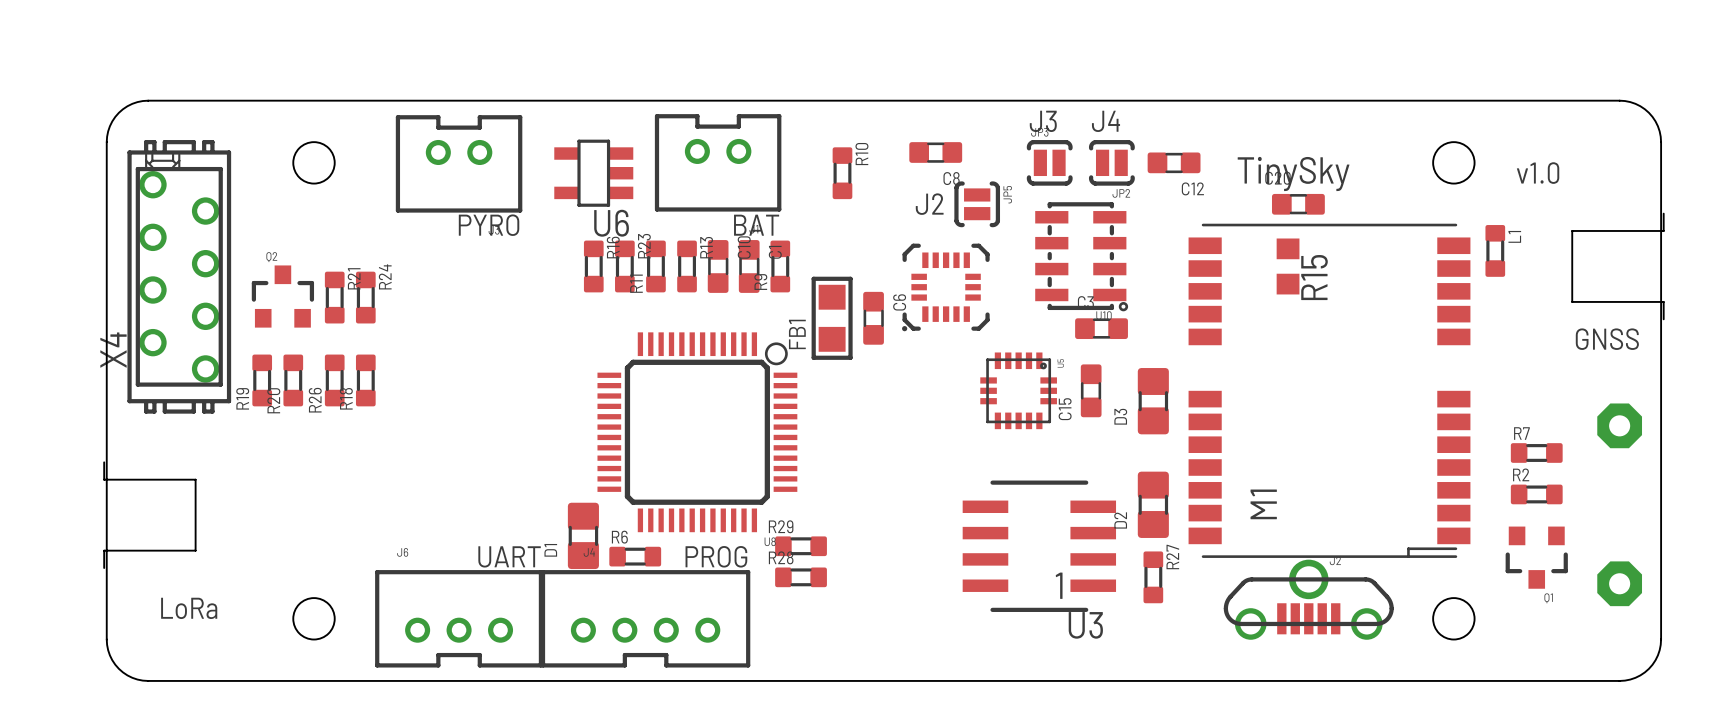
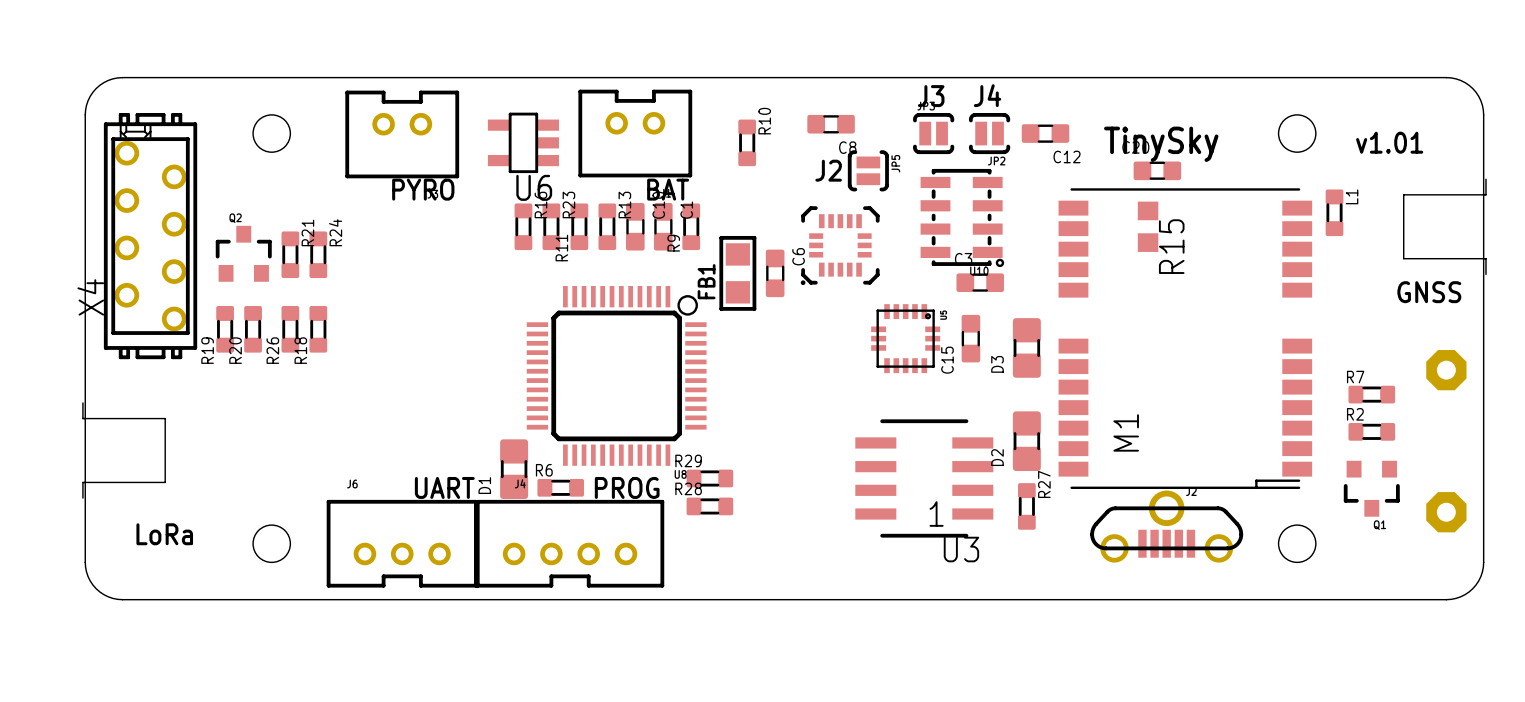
text: v1.0 (1538, 173) -> v1.01 (1389, 142)

